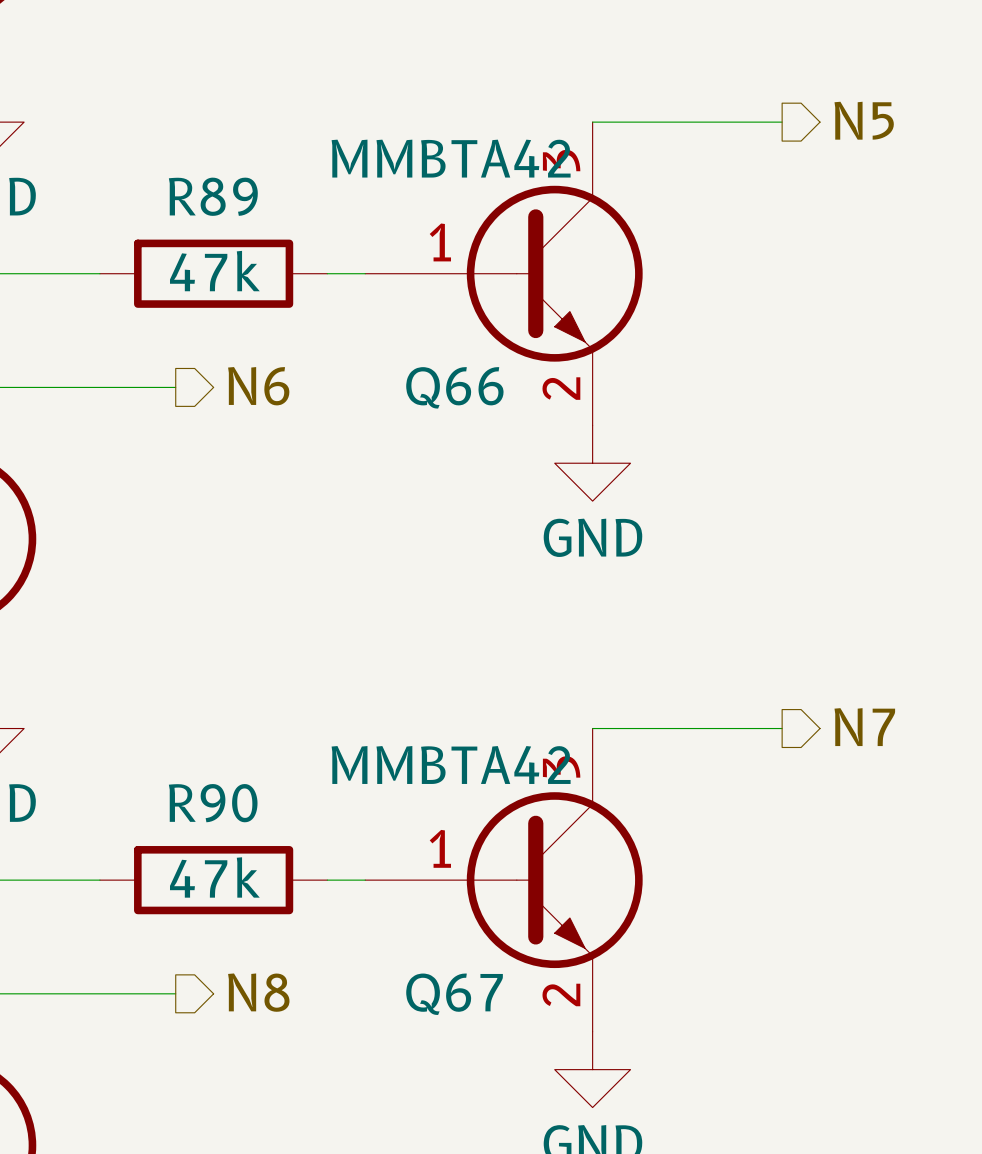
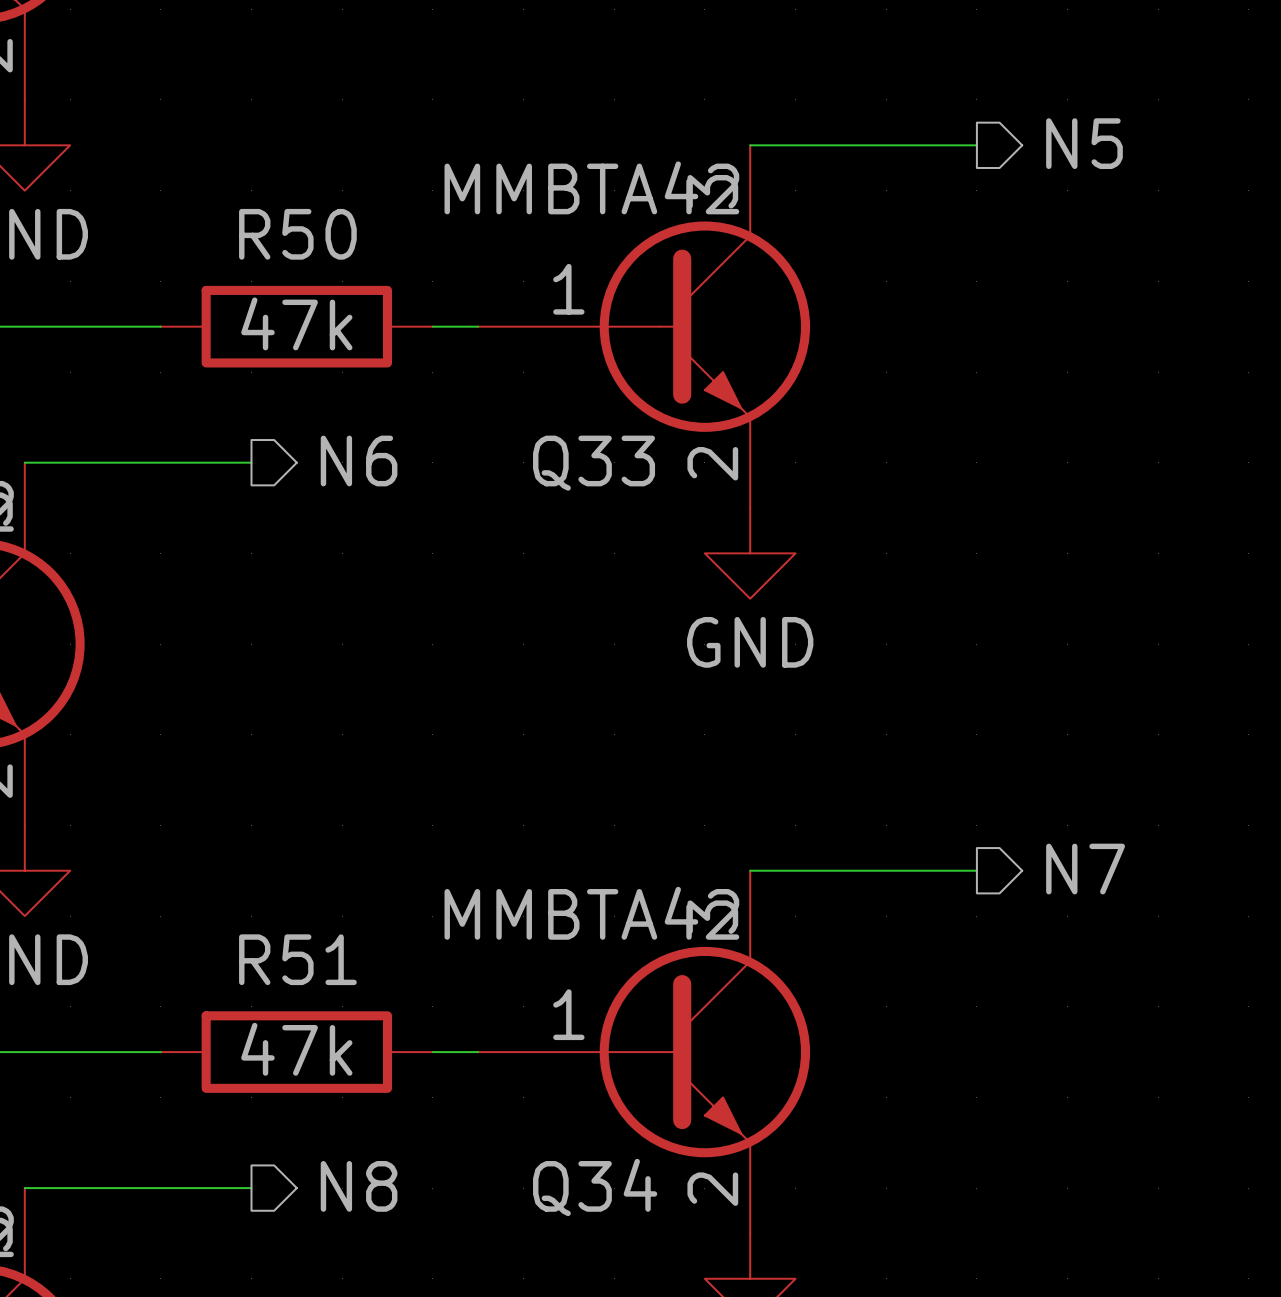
R89 name: R89 (213, 196) -> R50 (297, 234)
Q66 name: Q66 (454, 387) -> Q33 (594, 463)
R90 name: R90 (213, 803) -> R51 (297, 959)
Q67 name: Q67 (454, 994) -> Q34 (595, 1187)

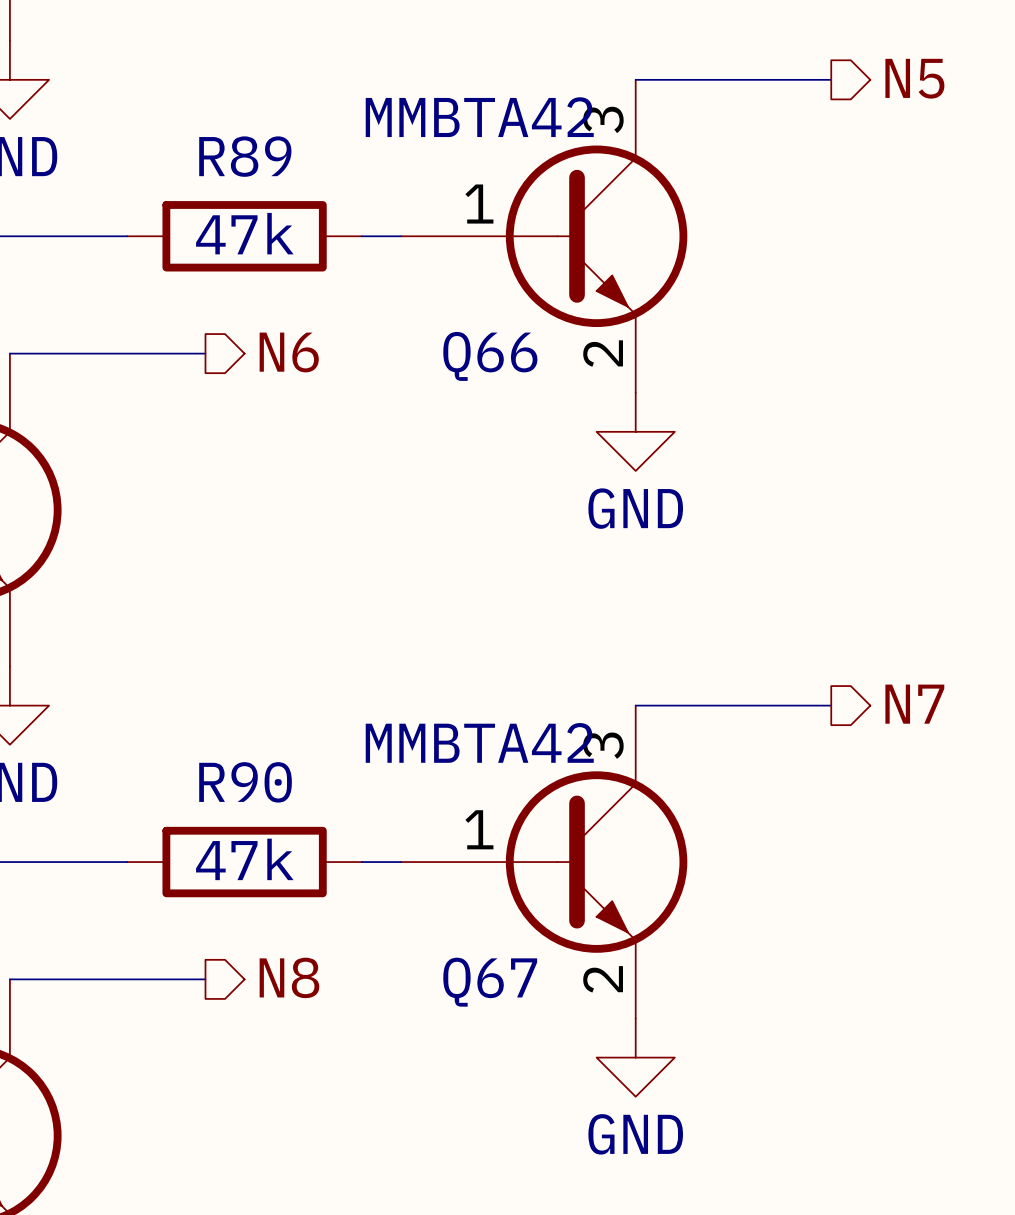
R50 name: R50 (297, 234) -> R89 (245, 156)
Q33 name: Q33 (594, 463) -> Q66 (490, 356)
R51 name: R51 (297, 959) -> R90 (245, 782)
Q34 name: Q34 (595, 1187) -> Q67 (490, 982)

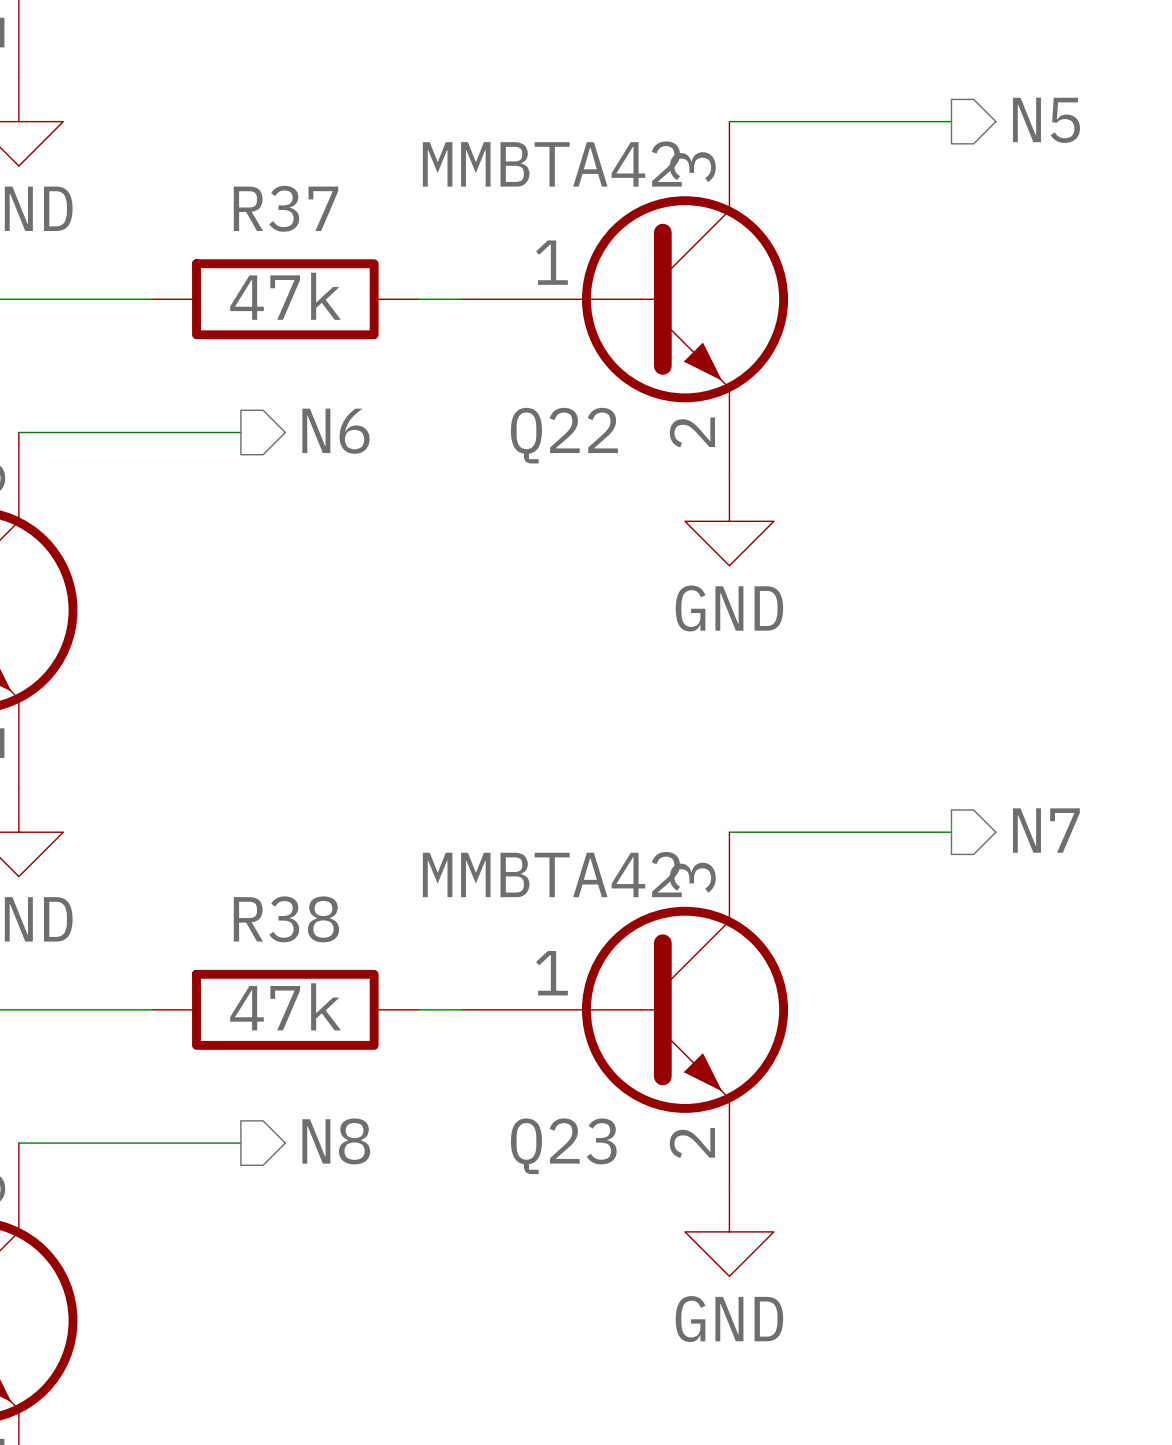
R89 name: R89 (245, 156) -> R37 (285, 208)
Q66 name: Q66 (490, 356) -> Q22 (564, 435)
R90 name: R90 (245, 782) -> R38 (286, 919)
Q67 name: Q67 (490, 982) -> Q23 (563, 1146)

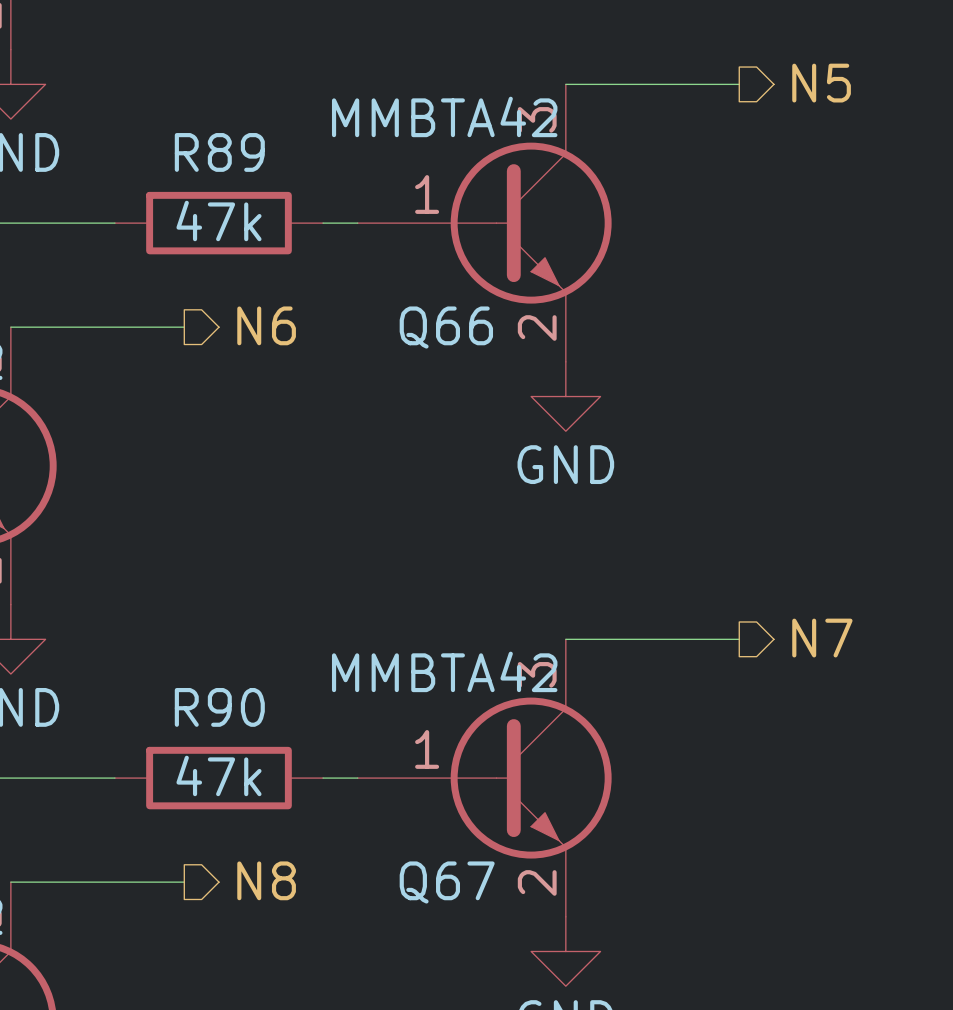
R37 name: R37 (285, 208) -> R89 (219, 152)
Q22 name: Q22 (564, 435) -> Q66 (446, 327)
R38 name: R38 (286, 919) -> R90 (219, 707)
Q23 name: Q23 (563, 1146) -> Q67 (447, 882)

